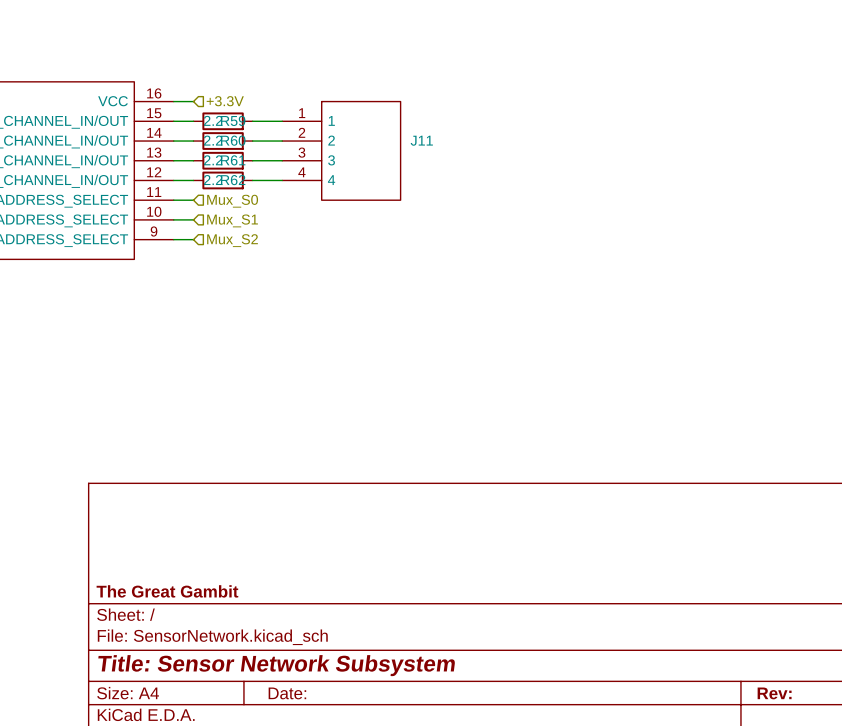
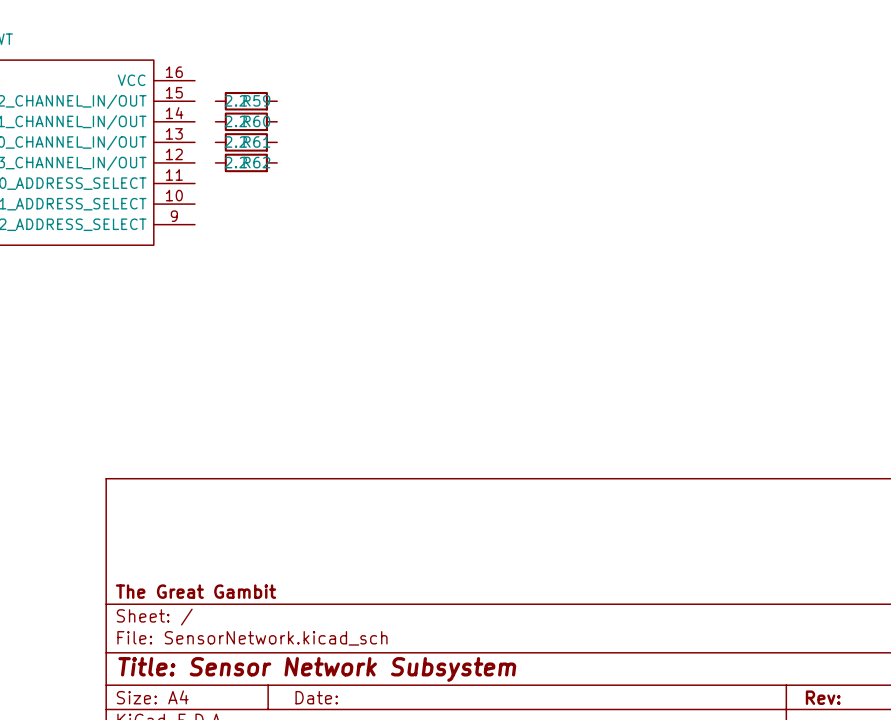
wire: (173, 101) (193, 101) -> none
hierarchical label: +3.3V (225, 101) -> none
wire: (173, 121) (193, 121) -> none
wire: (252, 121) (282, 121) -> none
wire: (173, 141) (193, 141) -> none
wire: (252, 141) (282, 141) -> none
J11: (341, 150) -> none
wire: (173, 160) (193, 160) -> none
wire: (252, 160) (282, 160) -> none
wire: (173, 180) (193, 180) -> none
wire: (252, 180) (282, 180) -> none
wire: (173, 200) (193, 200) -> none
hierarchical label: Mux_S0 (232, 201) -> none
wire: (173, 219) (193, 219) -> none
hierarchical label: Mux_S1 (232, 220) -> none
wire: (173, 239) (193, 239) -> none
hierarchical label: Mux_S2 (232, 240) -> none

